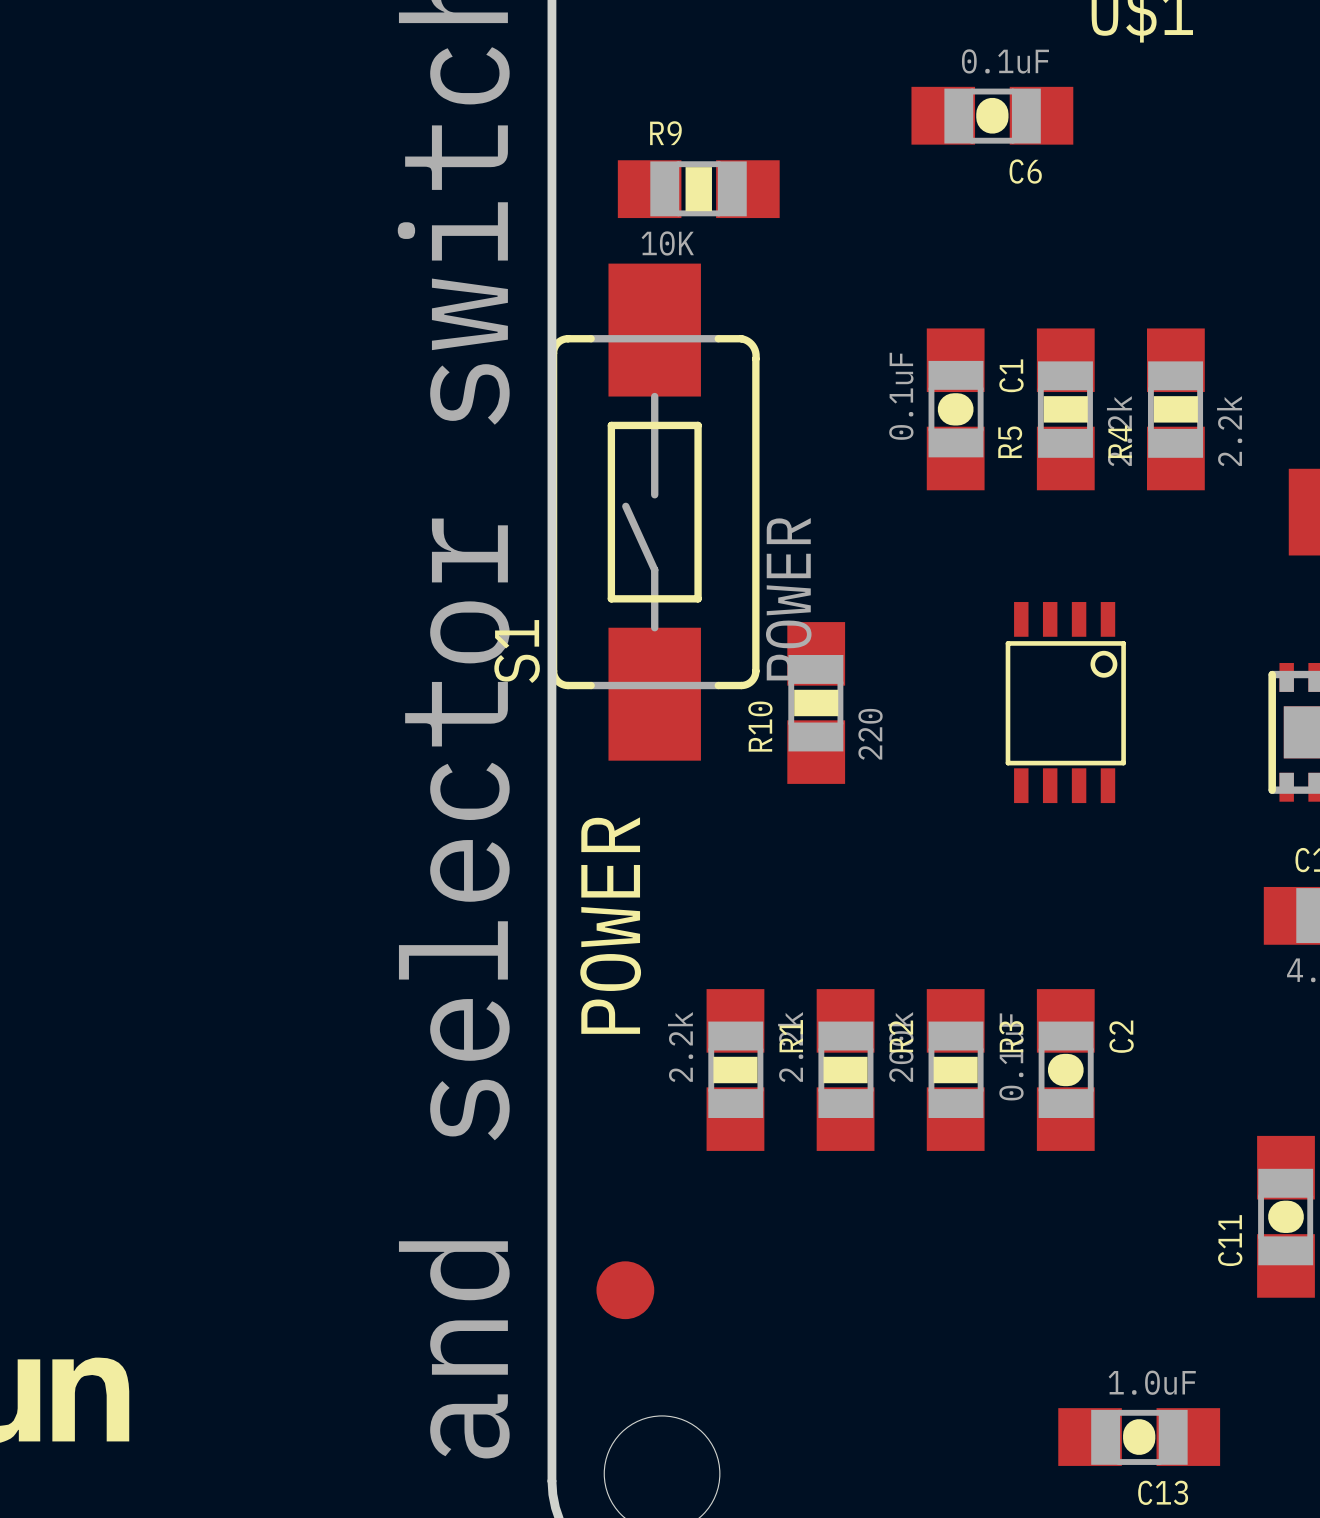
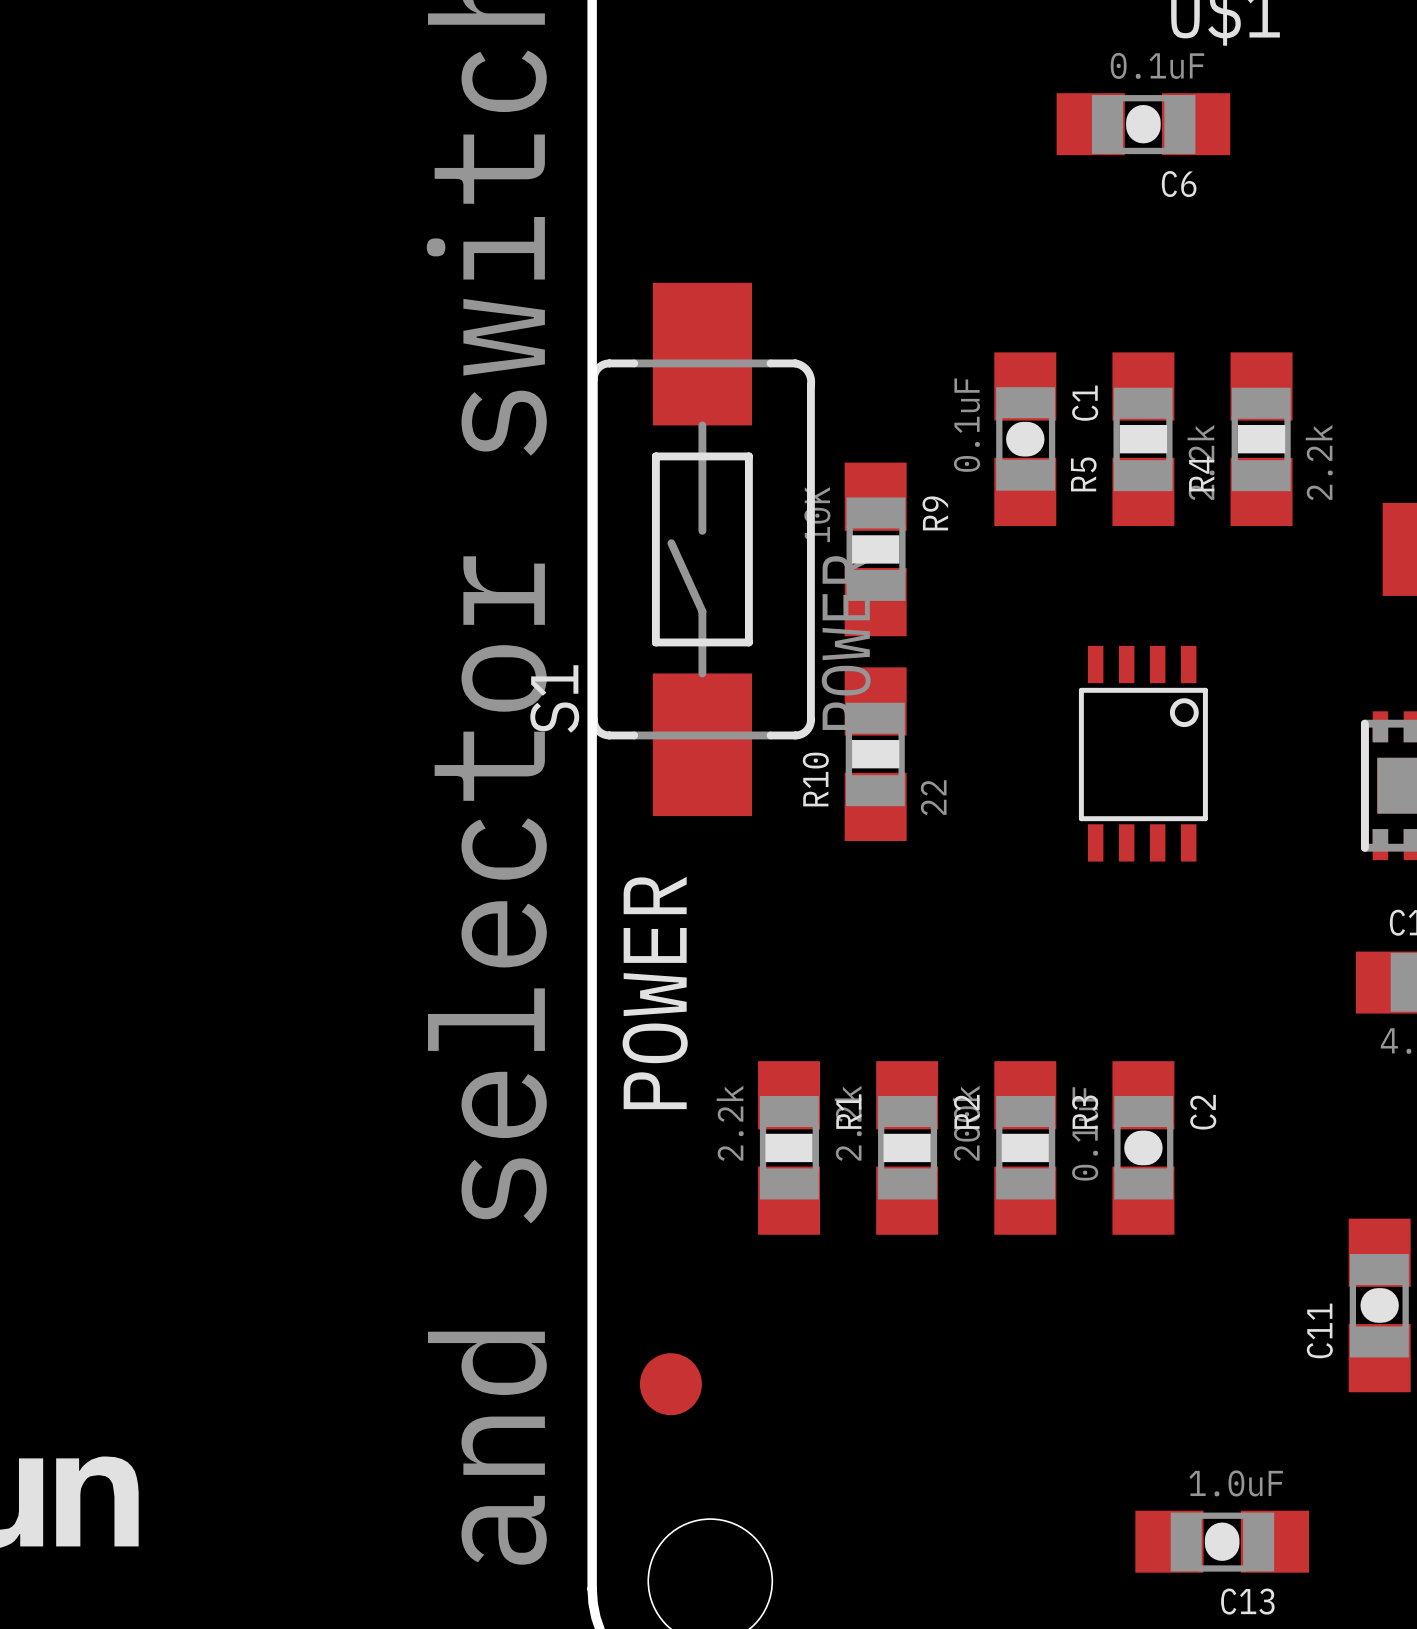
C6 position: (992, 115) -> (1143, 124)
R9 rotation: 0° (698, 189) -> 90° clockwise (875, 549)
R9 position: (698, 189) -> (875, 549)
R10 value: 220 (870, 734) -> 22 (933, 797)

